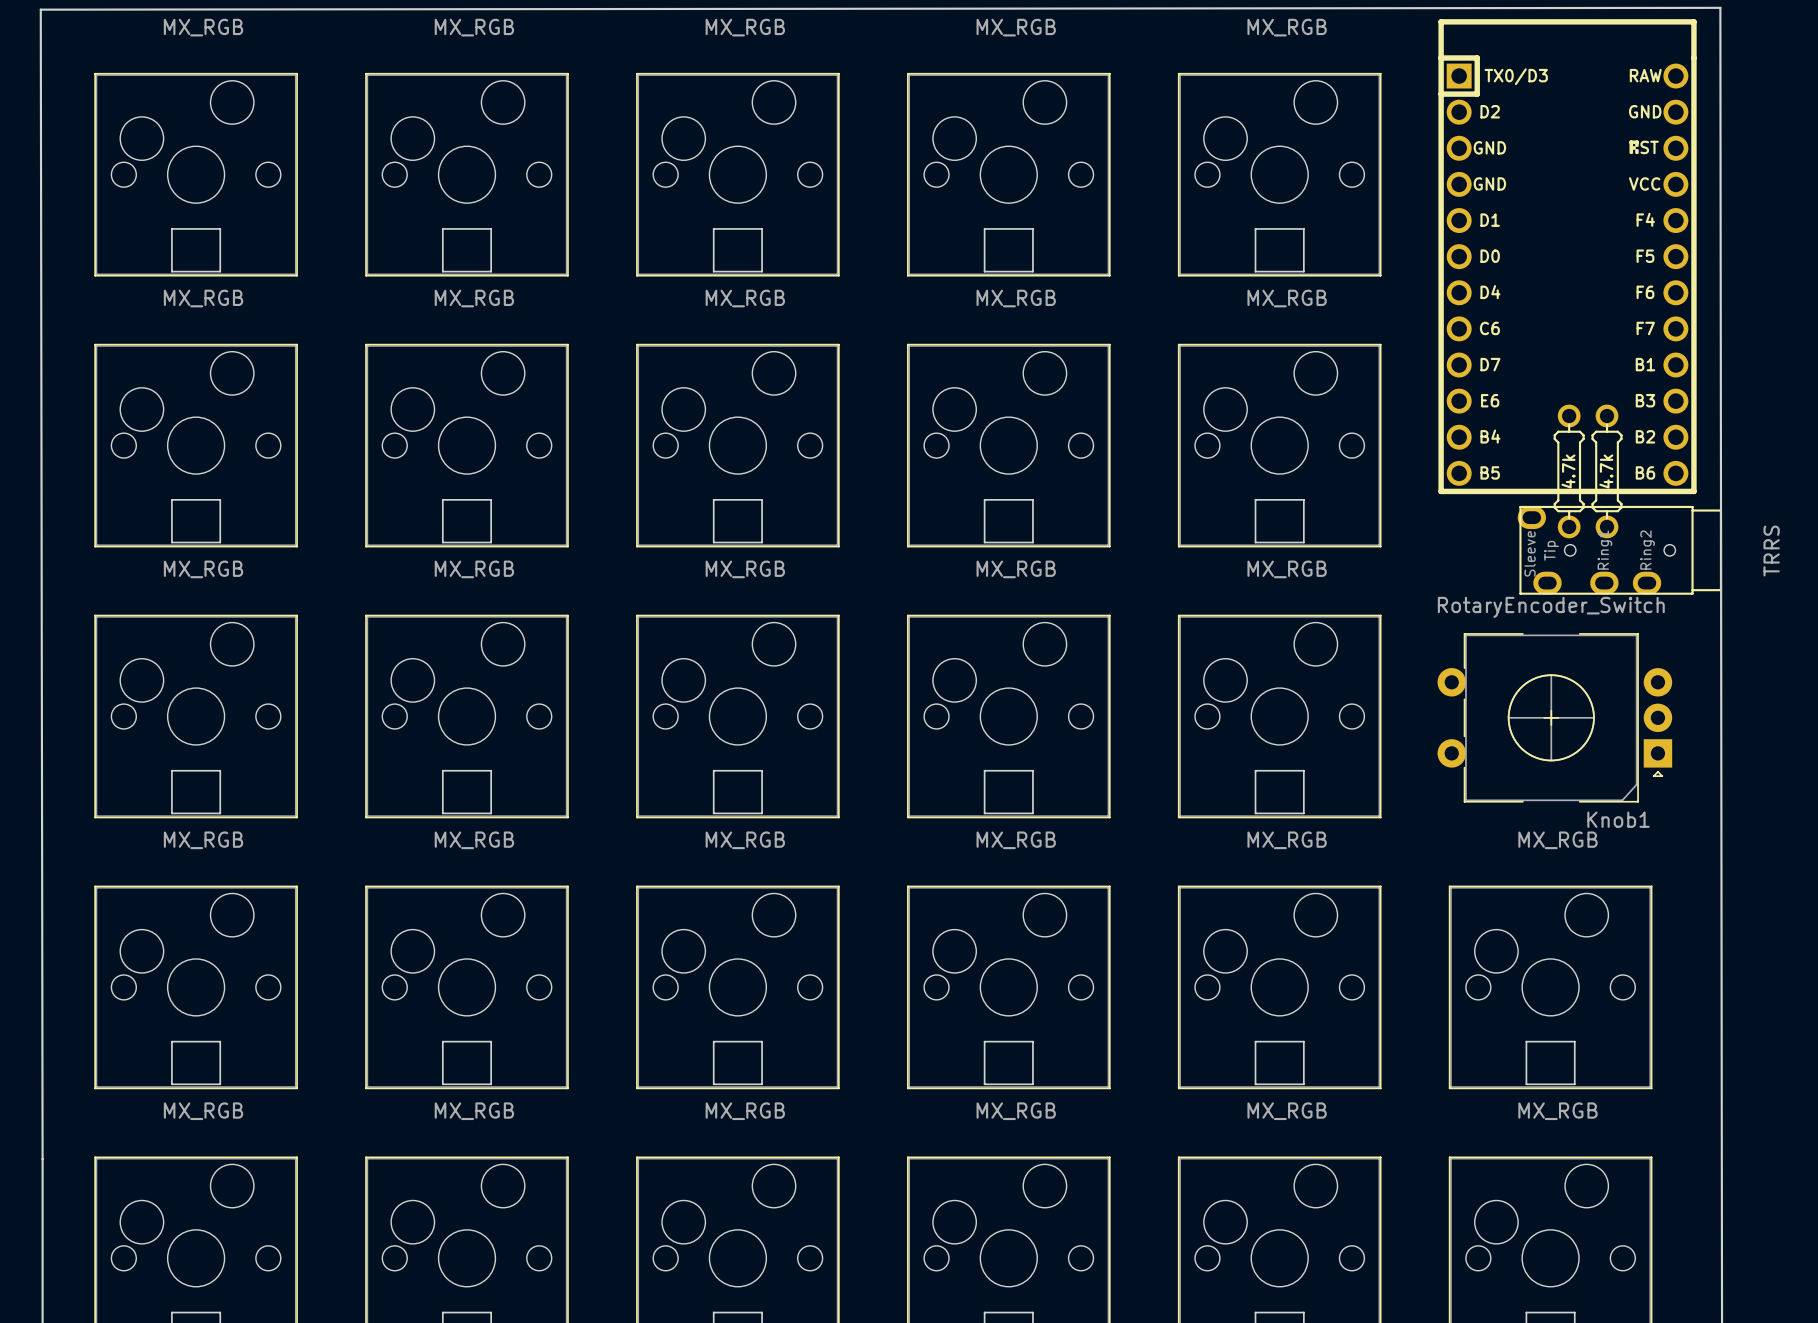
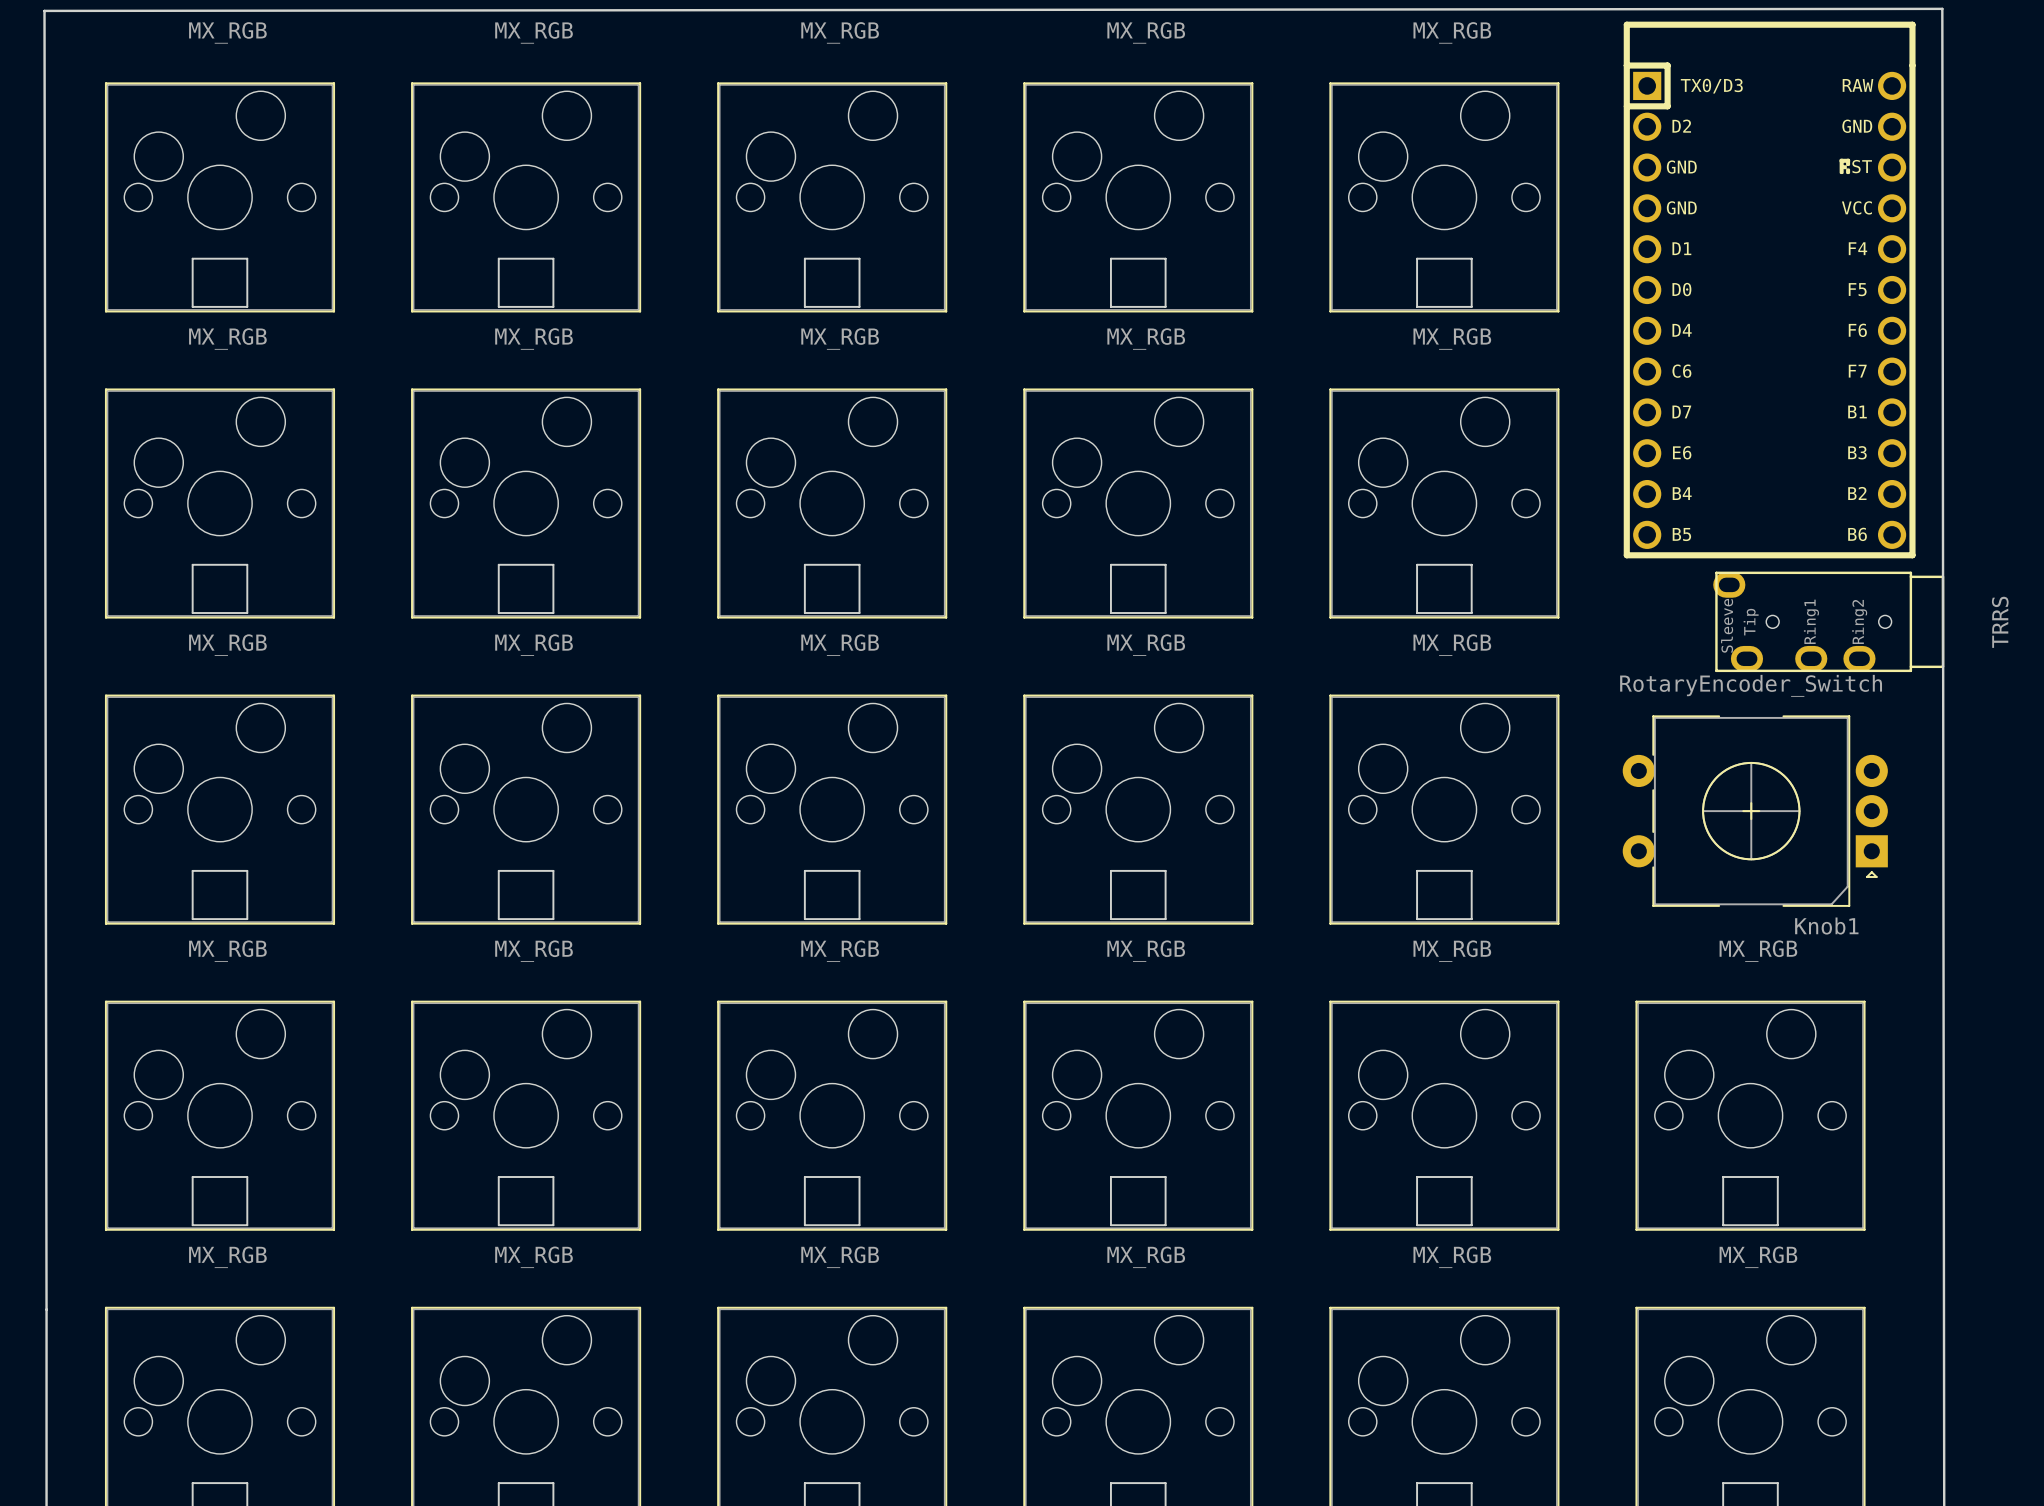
part: 4.7k (1569, 471) -> none
part: 4.7k (1607, 471) -> none

